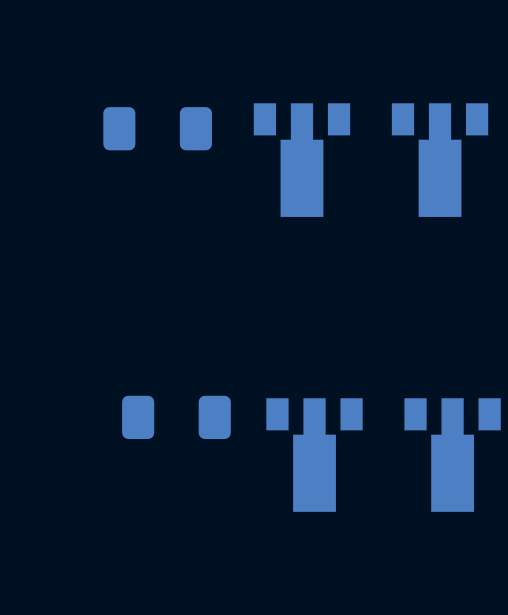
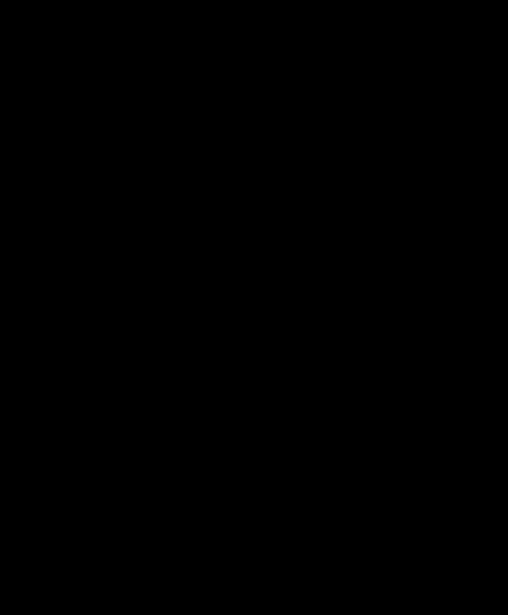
part: (157, 128) -> none
part: (301, 160) -> none
part: (440, 160) -> none
part: (176, 417) -> none
part: (314, 455) -> none
part: (452, 455) -> none

